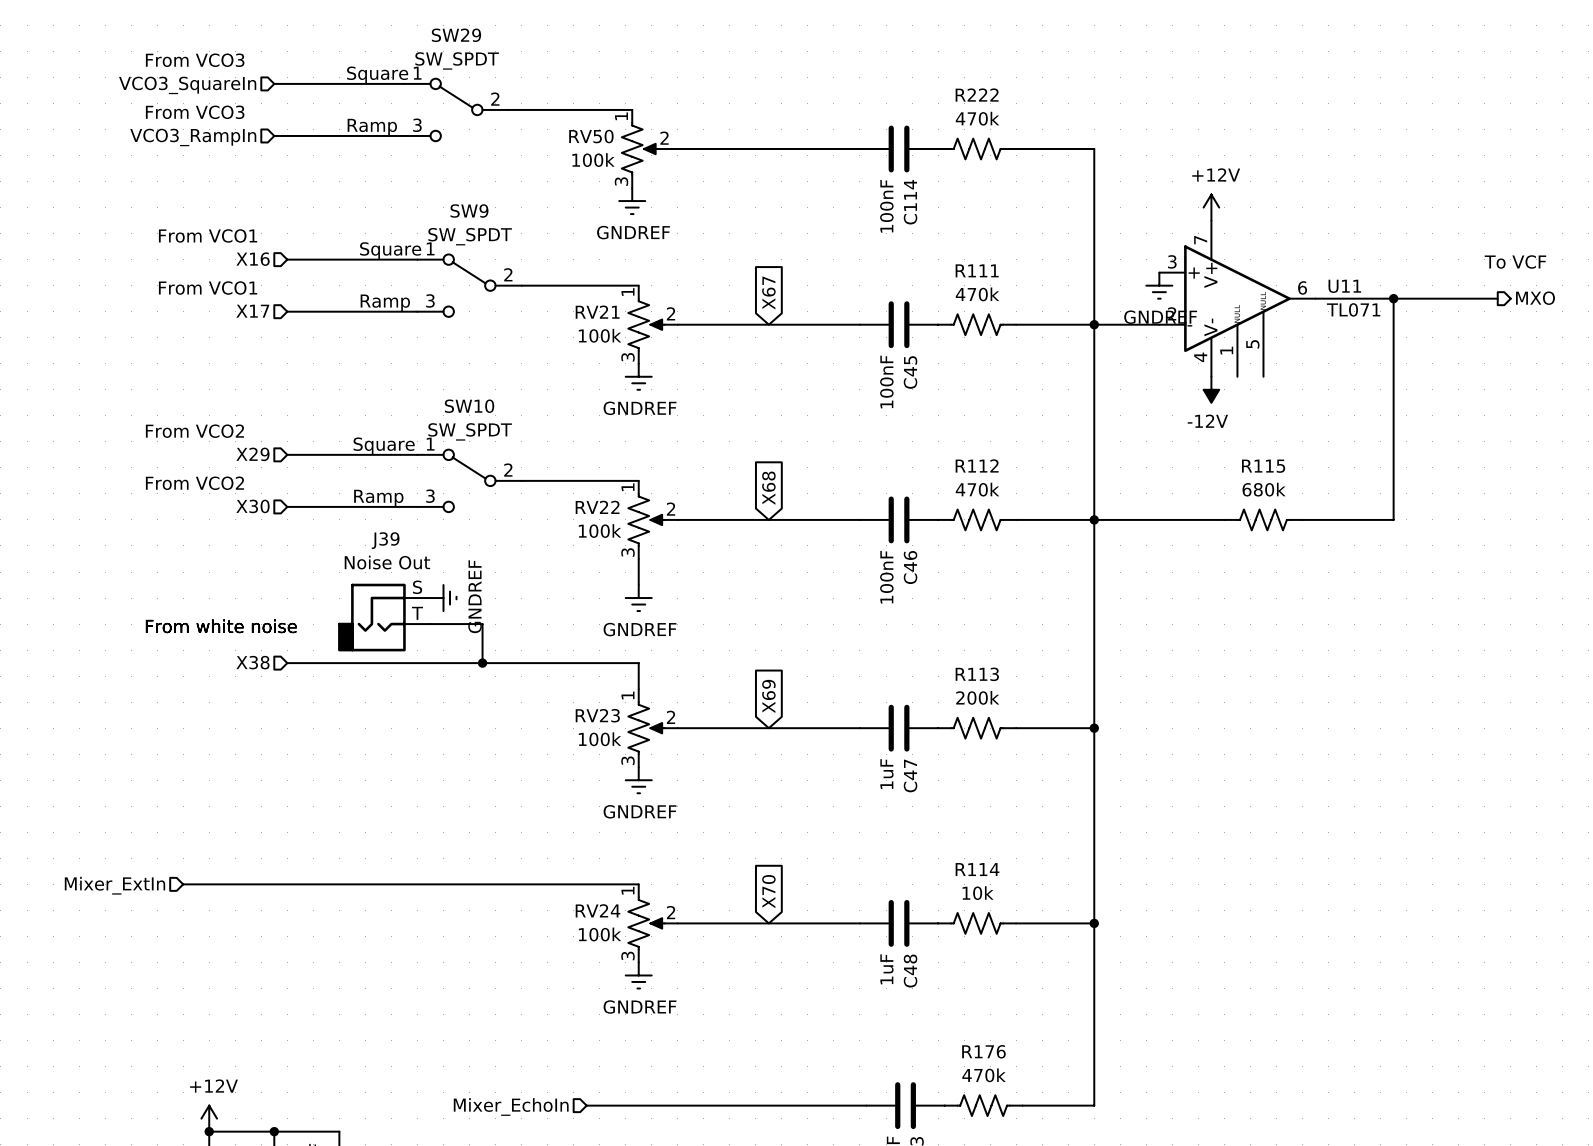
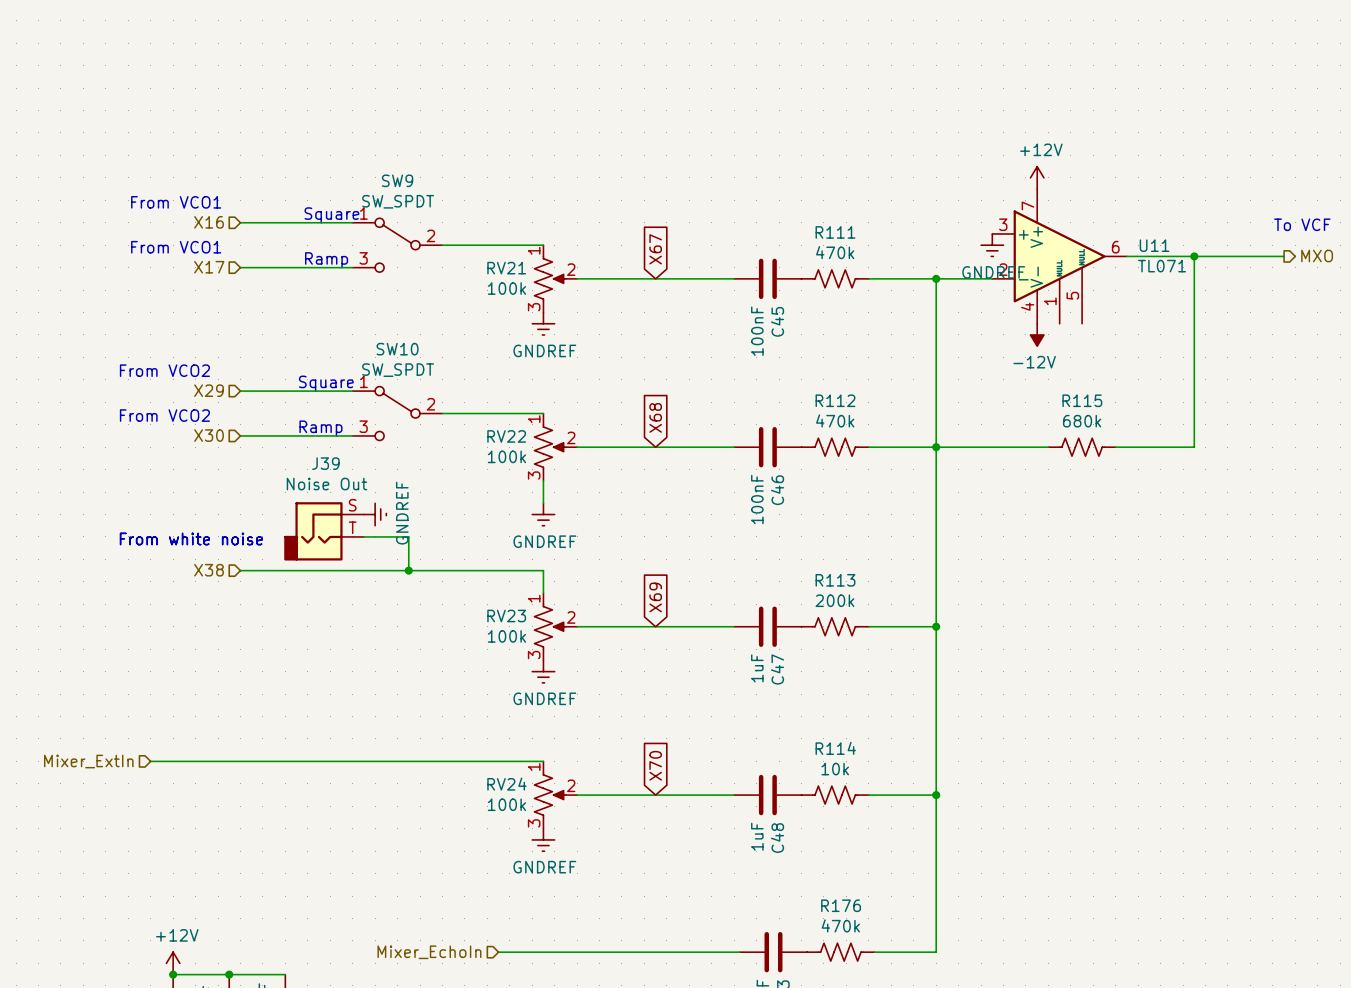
text: From VCO3 (195, 60) -> none
text: Square (377, 74) -> none
wire: (274, 83) (404, 83) -> none
hierarchical label: VCO3_SquareIn (187, 85) -> none
SW29: SW_SPDT (456, 109) -> none
wire: (508, 109) (632, 109) -> none
text: From VCO3 (195, 112) -> none
text: Ramp (372, 127) -> none
wire: (274, 135) (404, 135) -> none
hierarchical label: VCO3_RampIn (193, 137) -> none
RV50: 100k (646, 148) -> none
wire: (671, 148) (859, 148) -> none
C114: 100nF (899, 148) -> none
R222: 470k (977, 148) -> none
wire: (1016, 148) (1094, 148) (1094, 324) -> none
power symbol: GNDREF (632, 201) -> none

